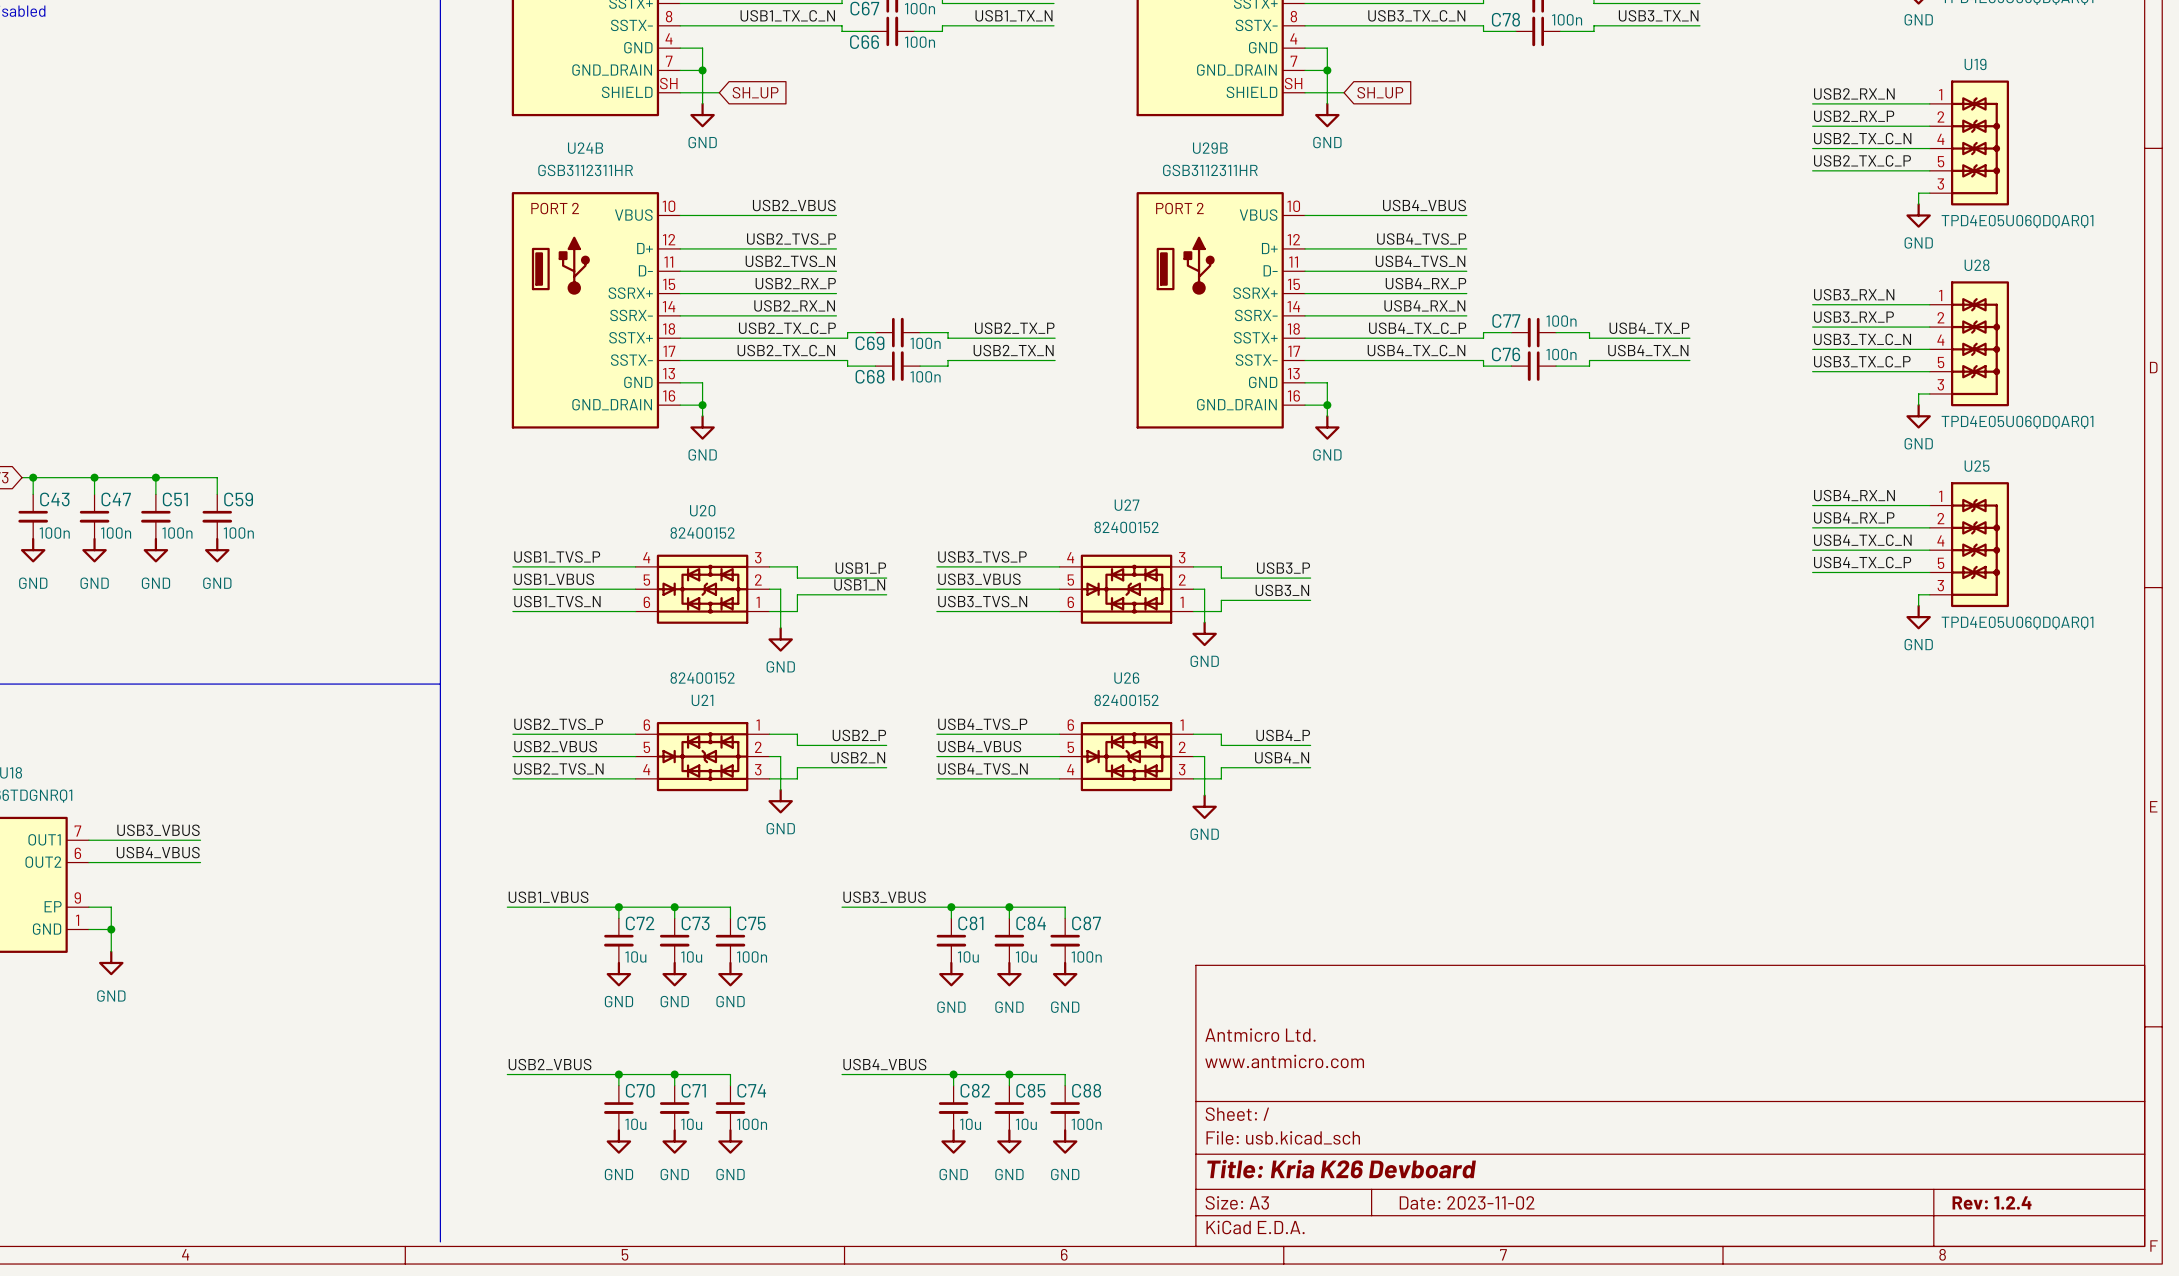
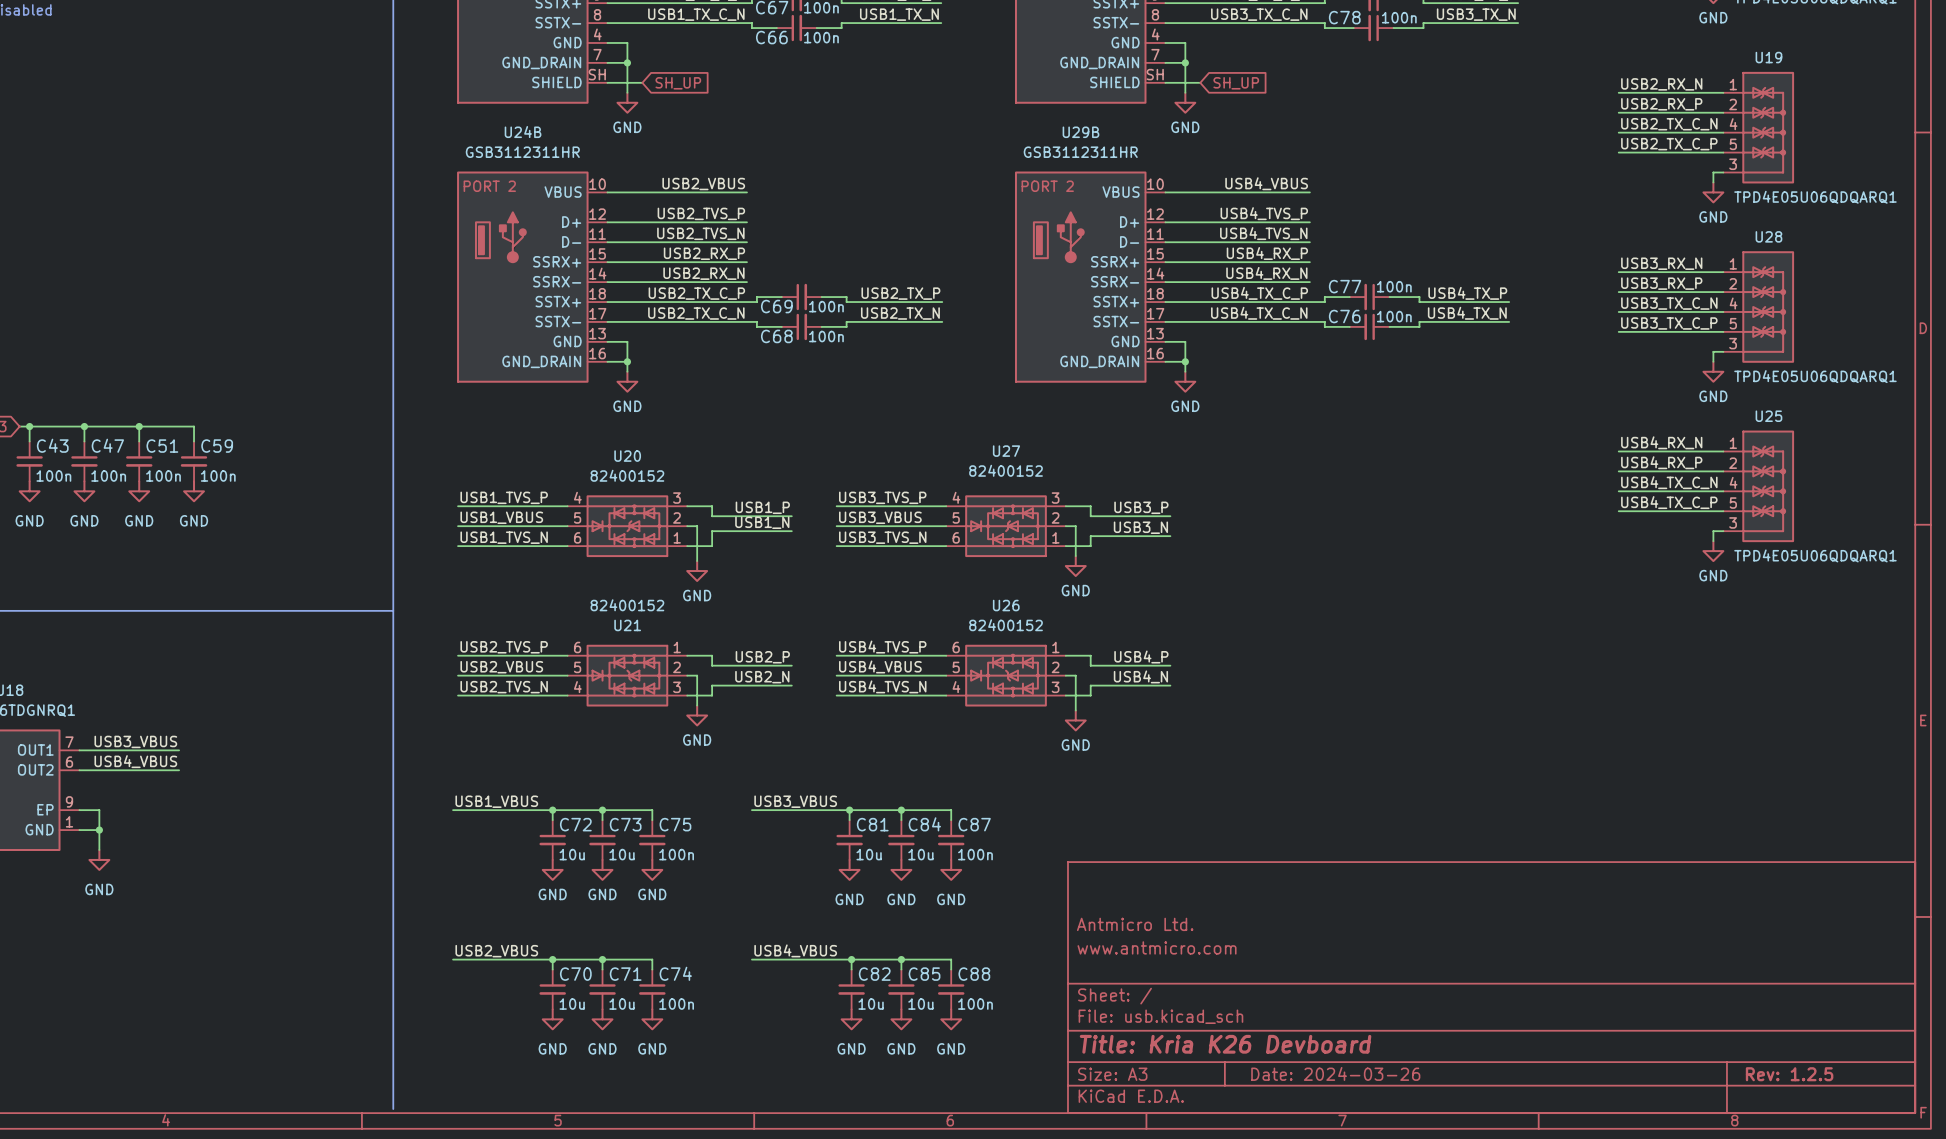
title block: Date: 2023-11-02 (1467, 1202) -> Date: 2024-03-26 (1335, 1073)
title block: Rev: 1.2.4 (1992, 1202) -> Rev: 1.2.5 (1789, 1074)

